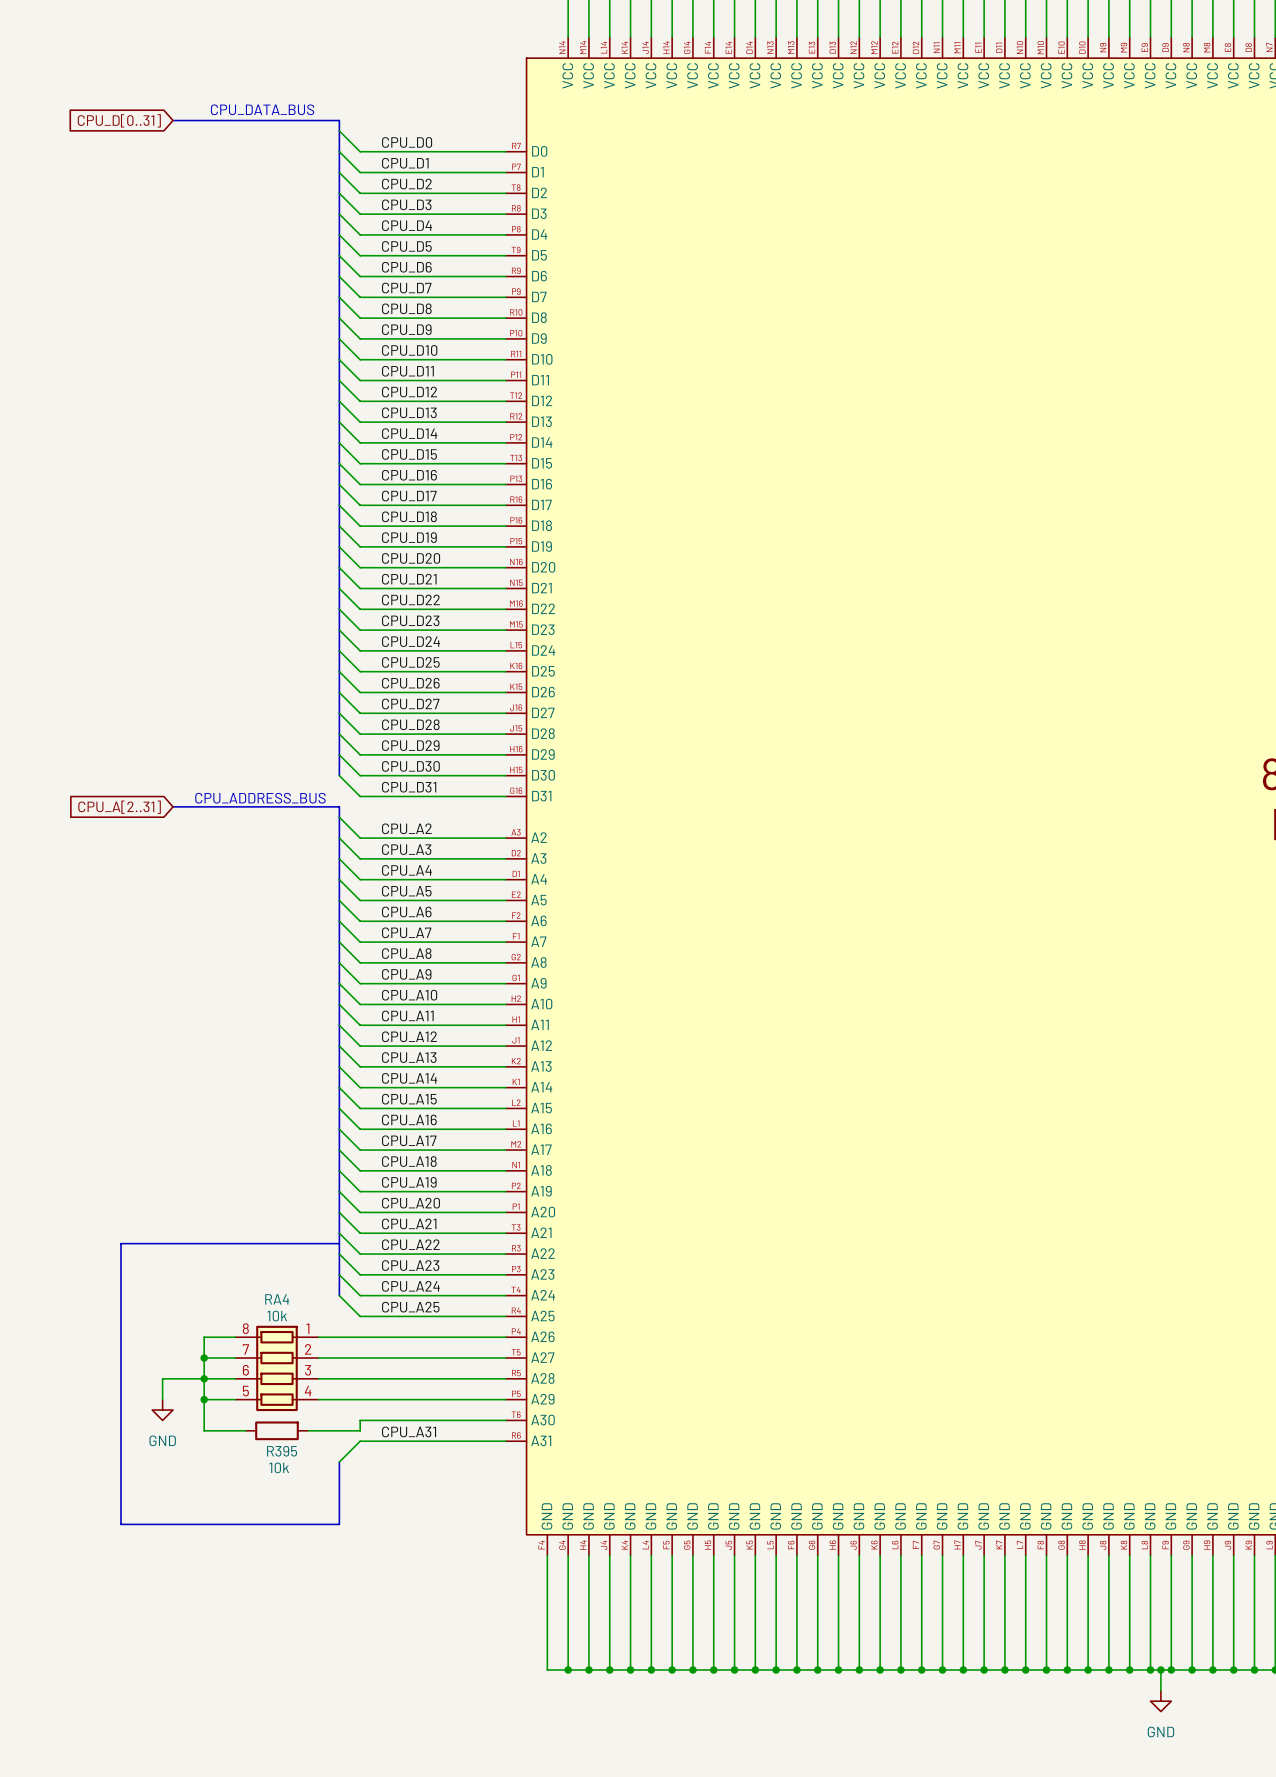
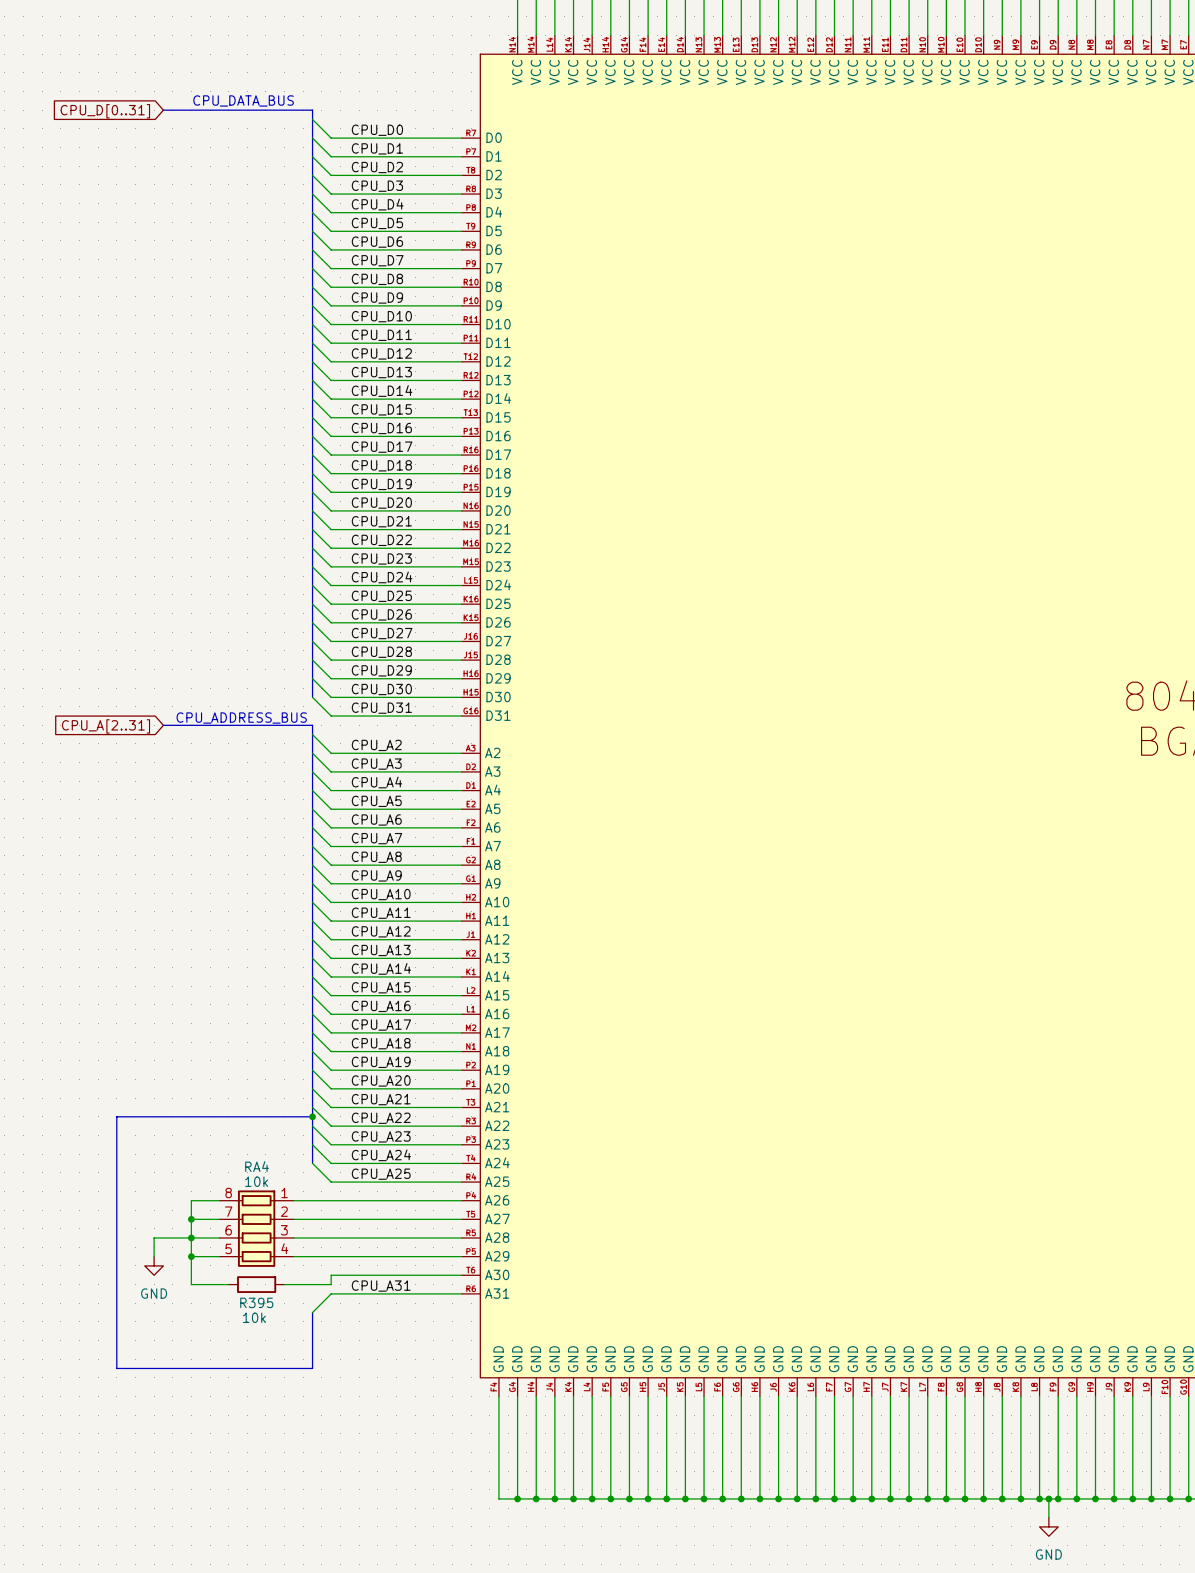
junction: none -> (312, 1116)

